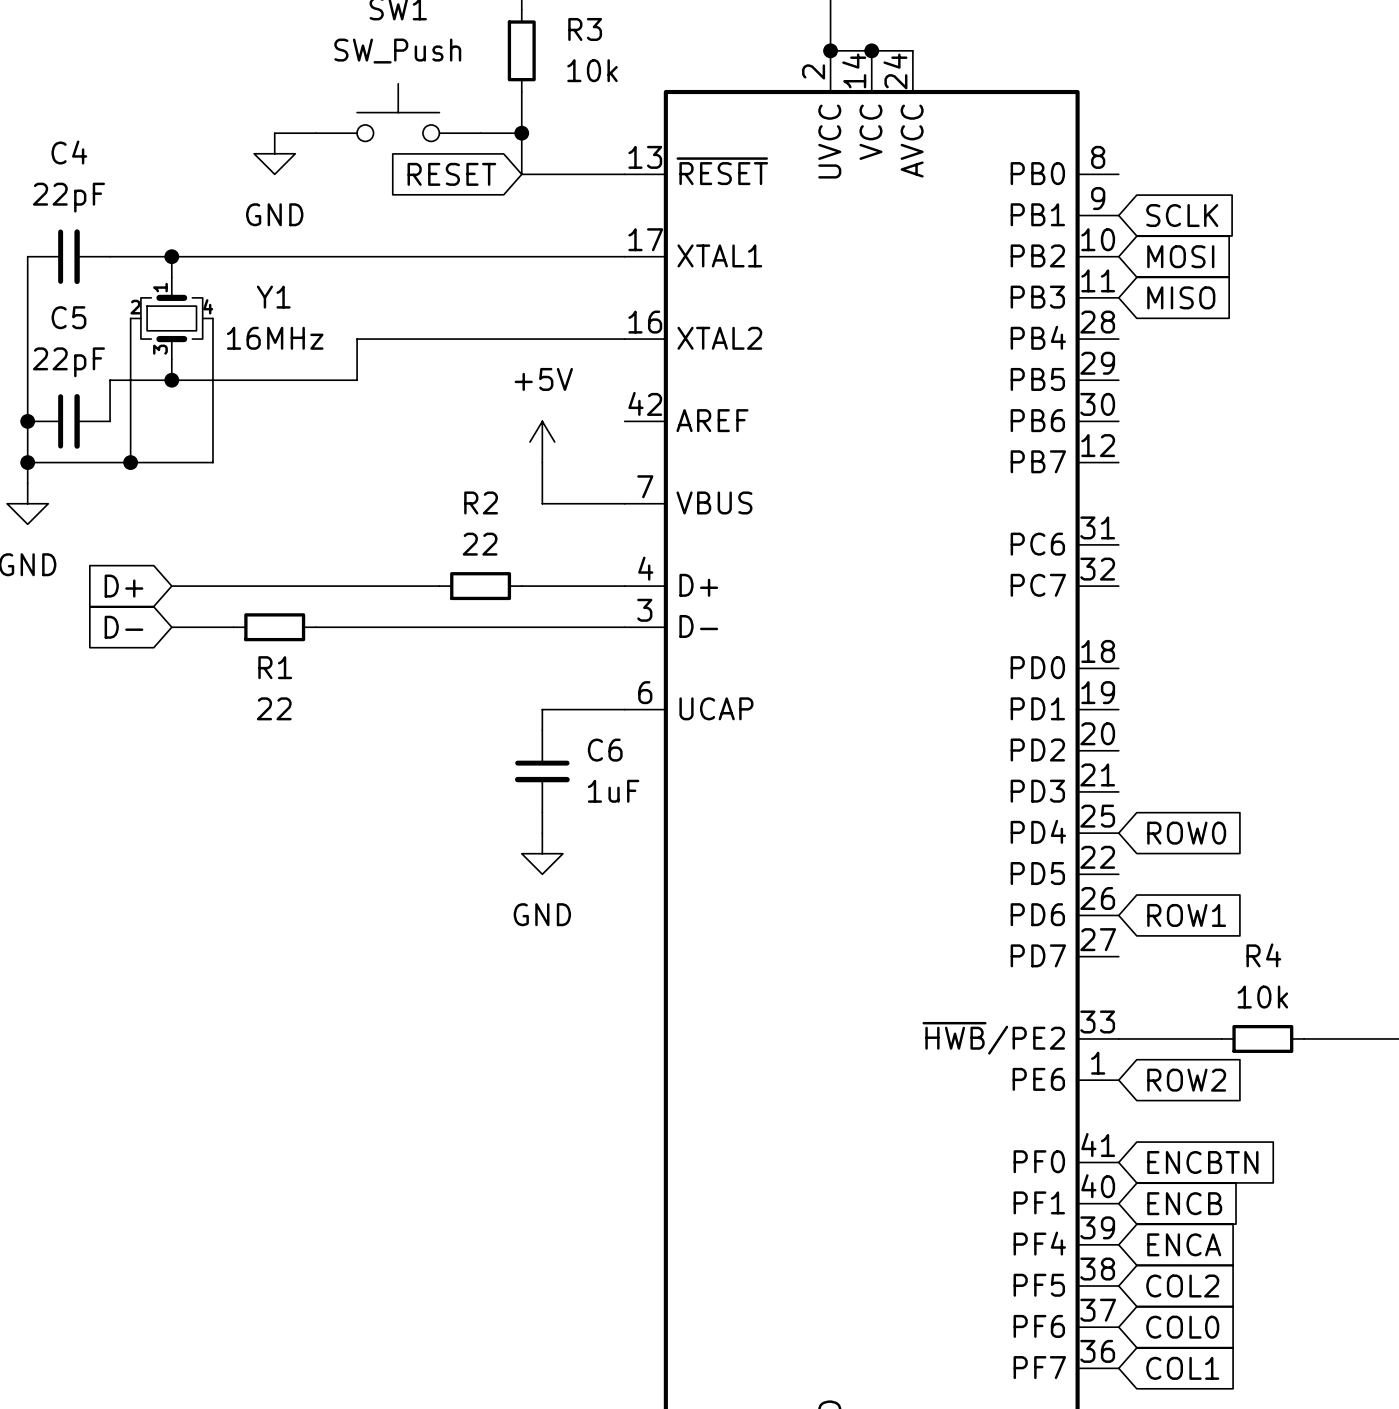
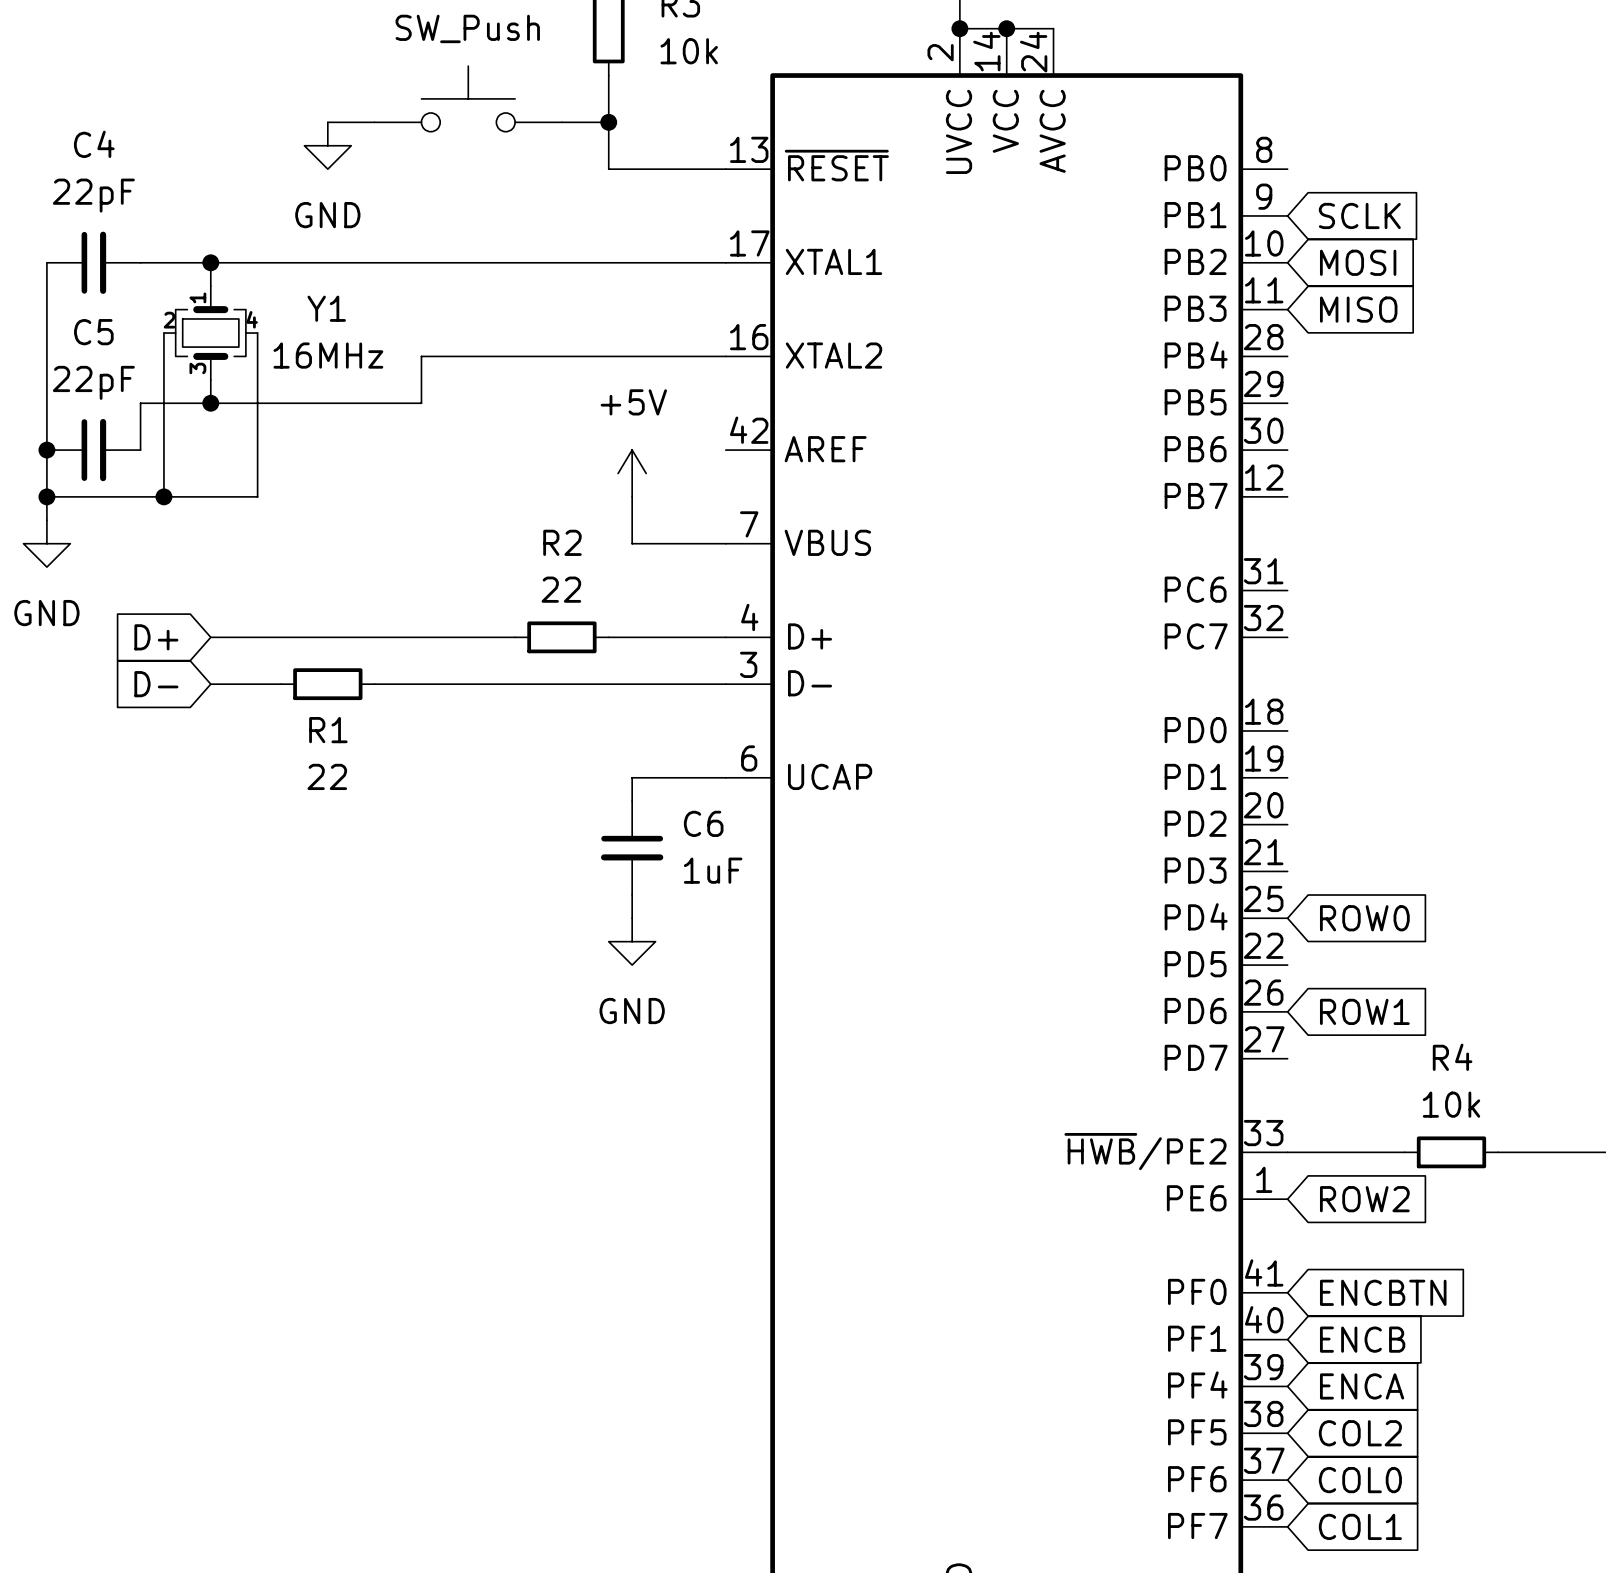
global label: RESET (451, 174) -> none

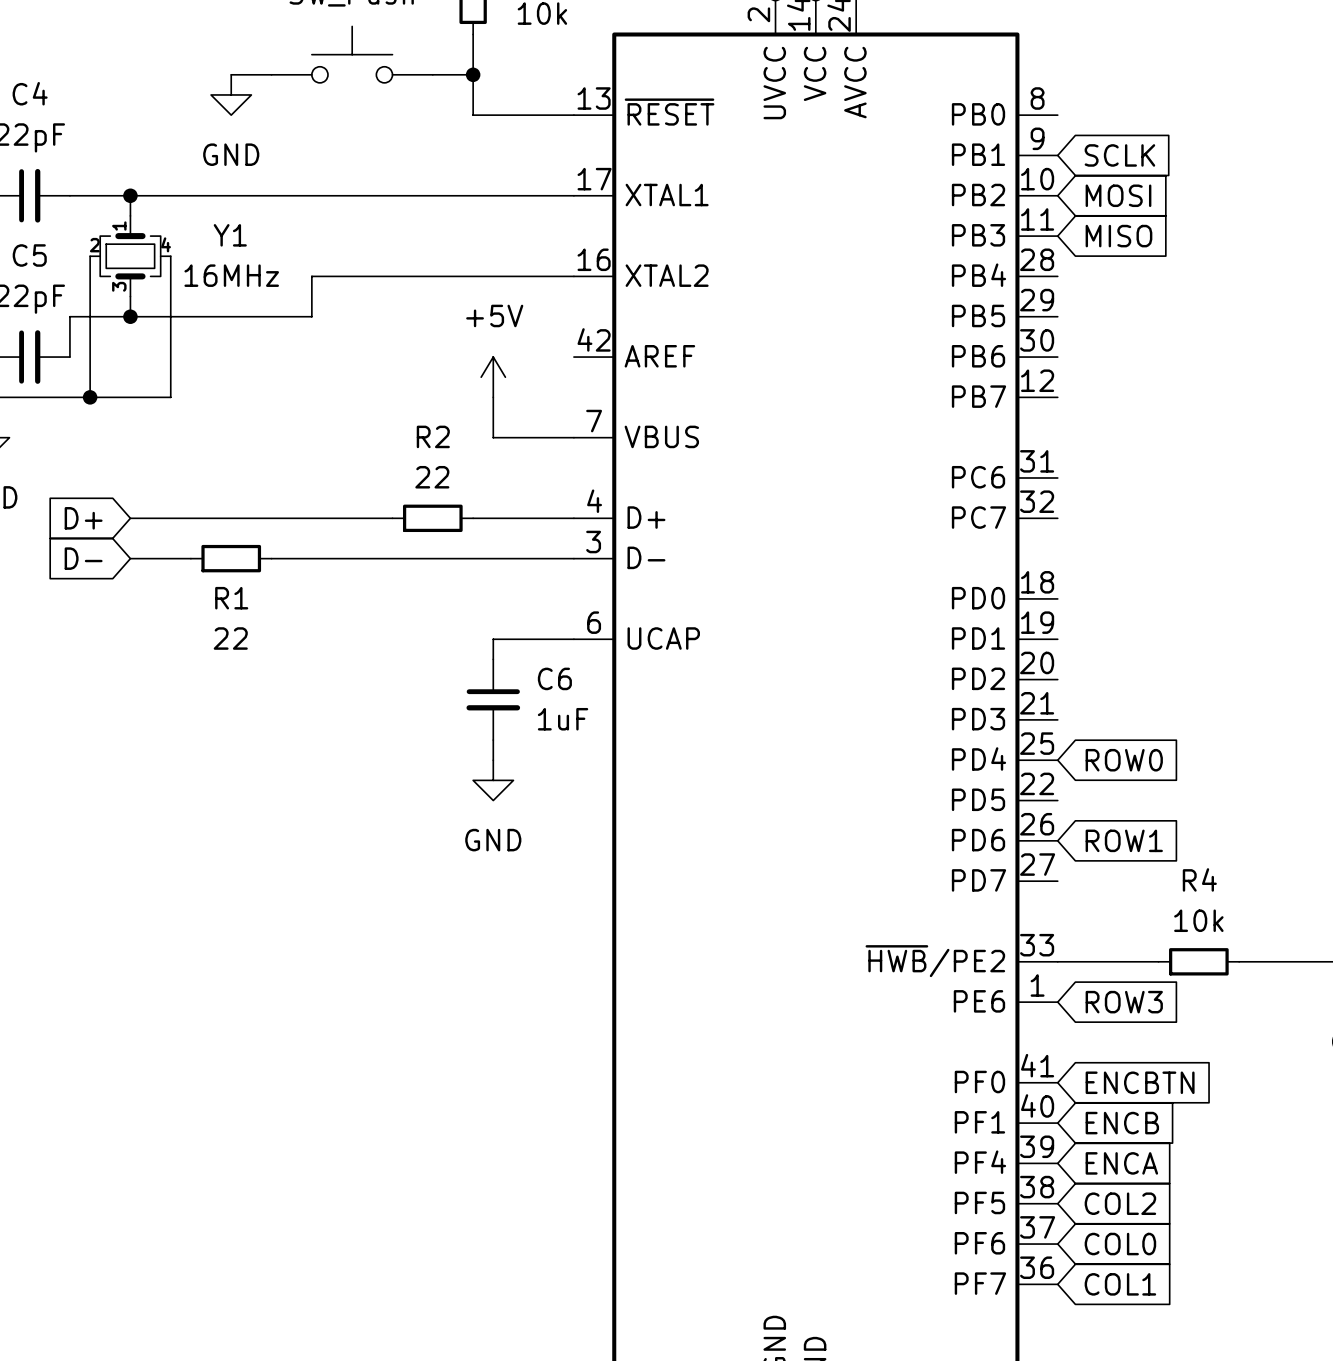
global label: ROW2 (1364, 1199) -> ROW3 (1124, 1002)

